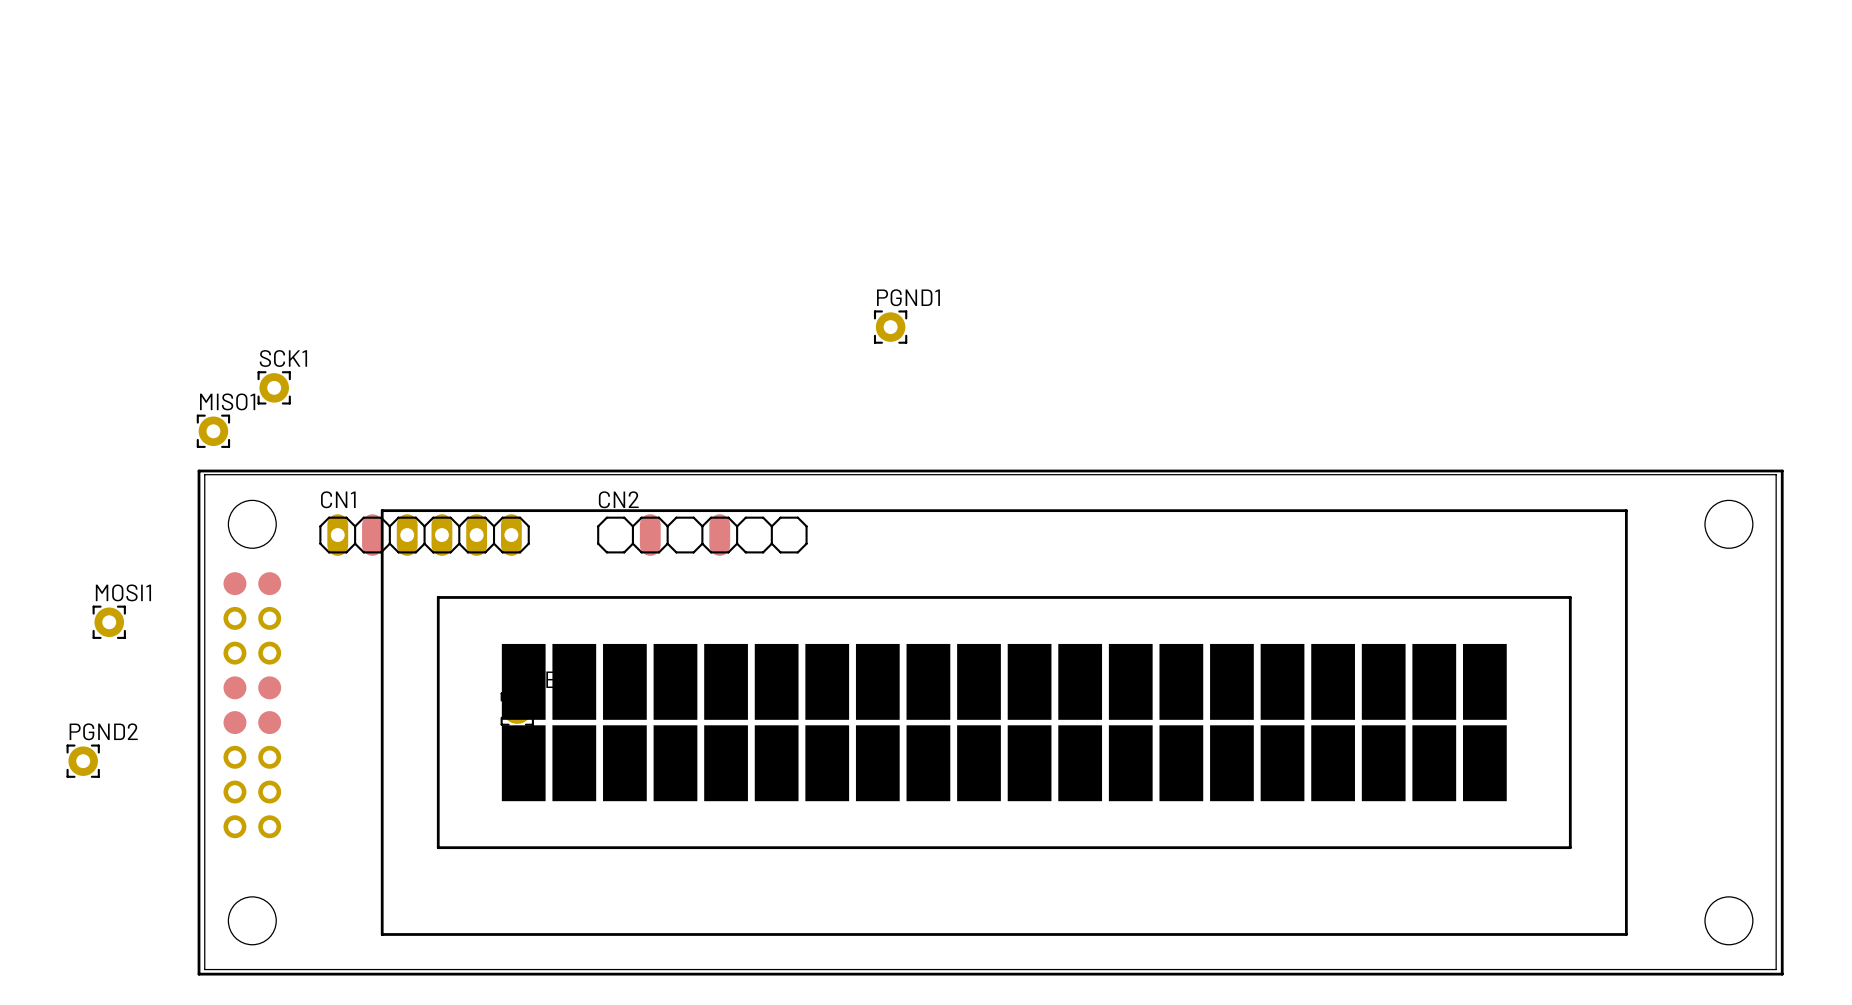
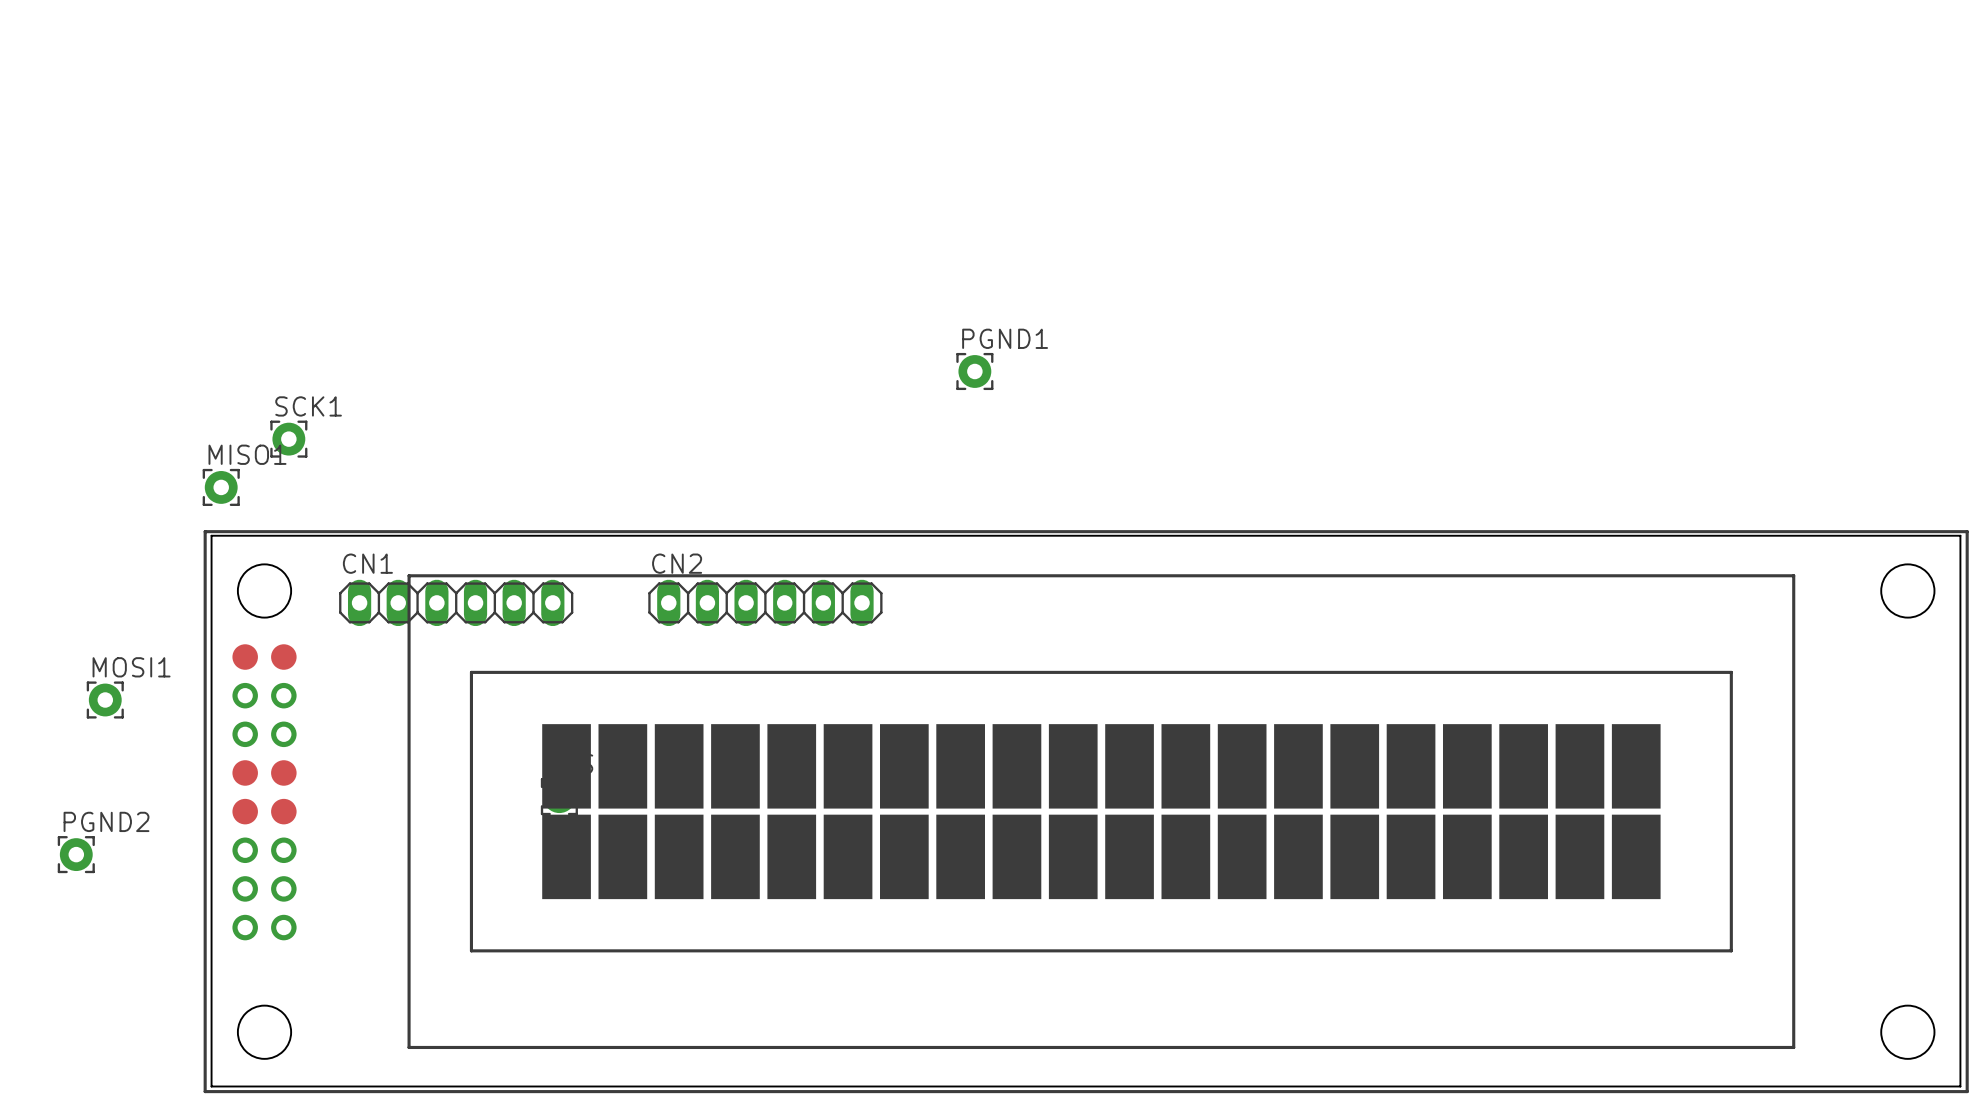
CN1 footprint: [319, 514, 530, 556] -> [339, 579, 574, 627]
CN2 footprint: [597, 514, 808, 556] -> [648, 579, 883, 627]

